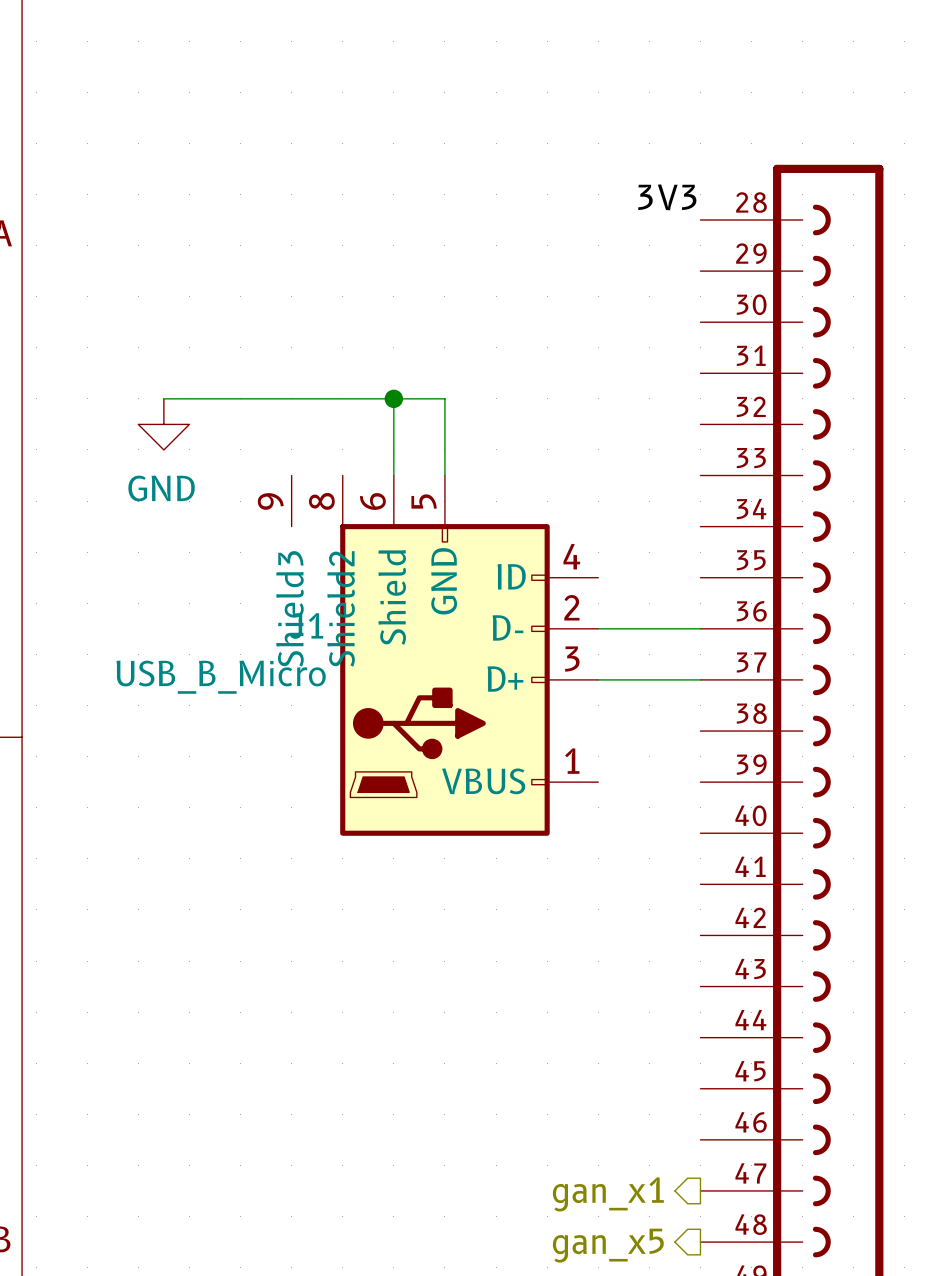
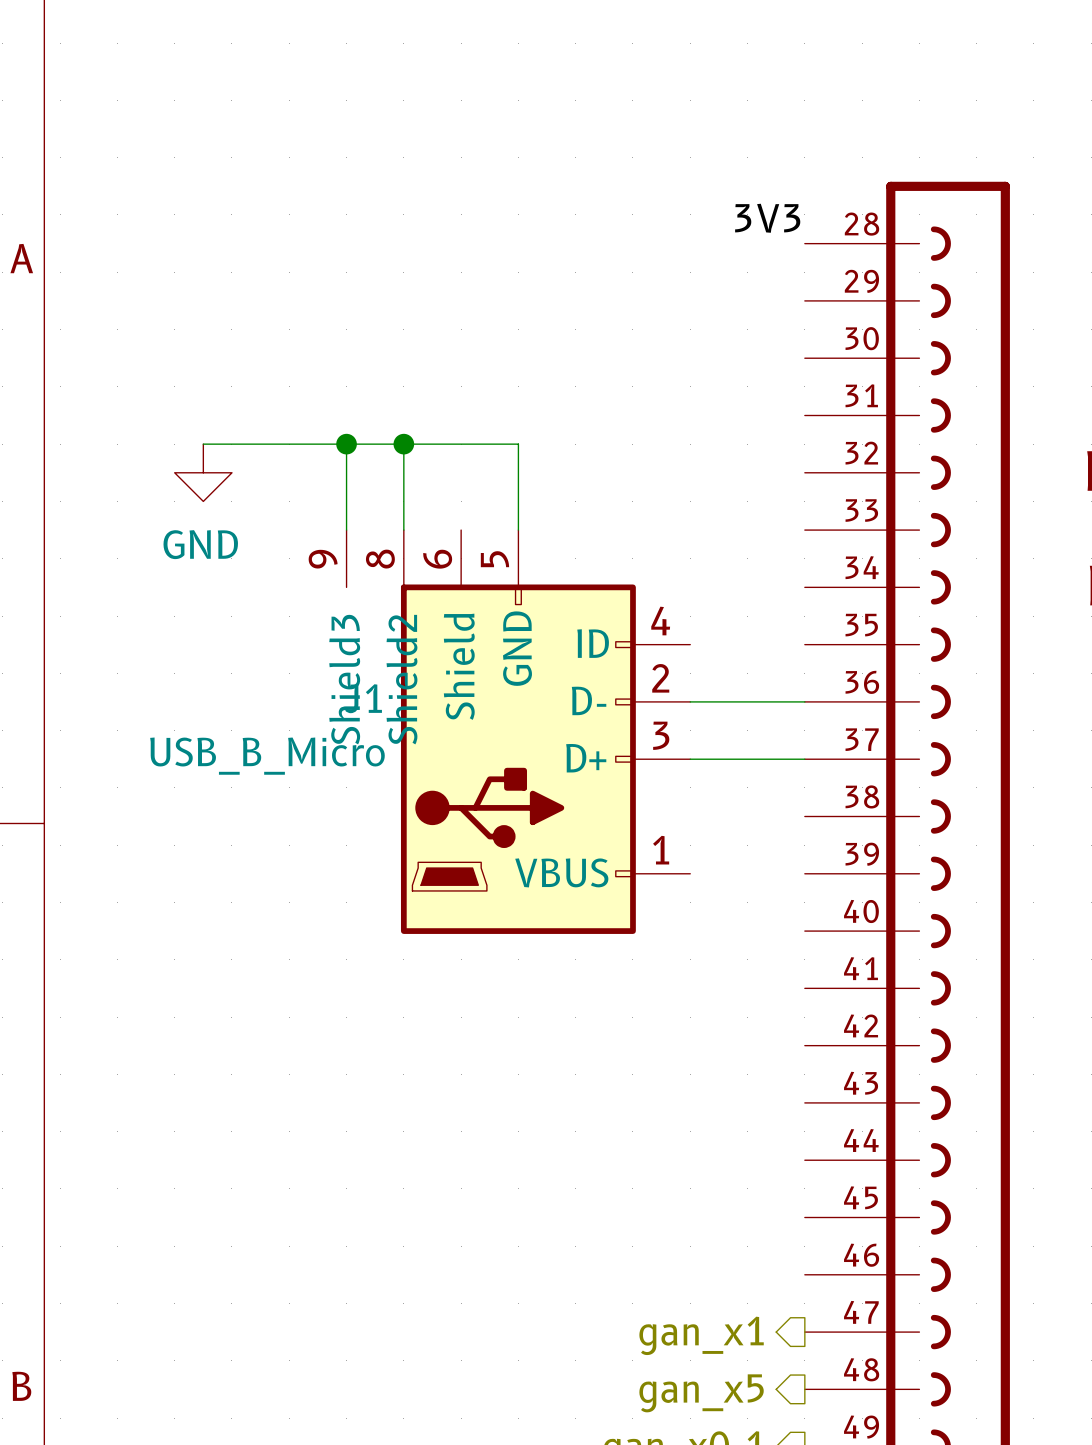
wire: none -> (346, 444) (346, 530)
junction: none -> (346, 444)
junction: none -> (403, 444)
wire: (393, 398) (393, 475) -> (403, 444) (403, 530)
junction: (393, 398) -> none

